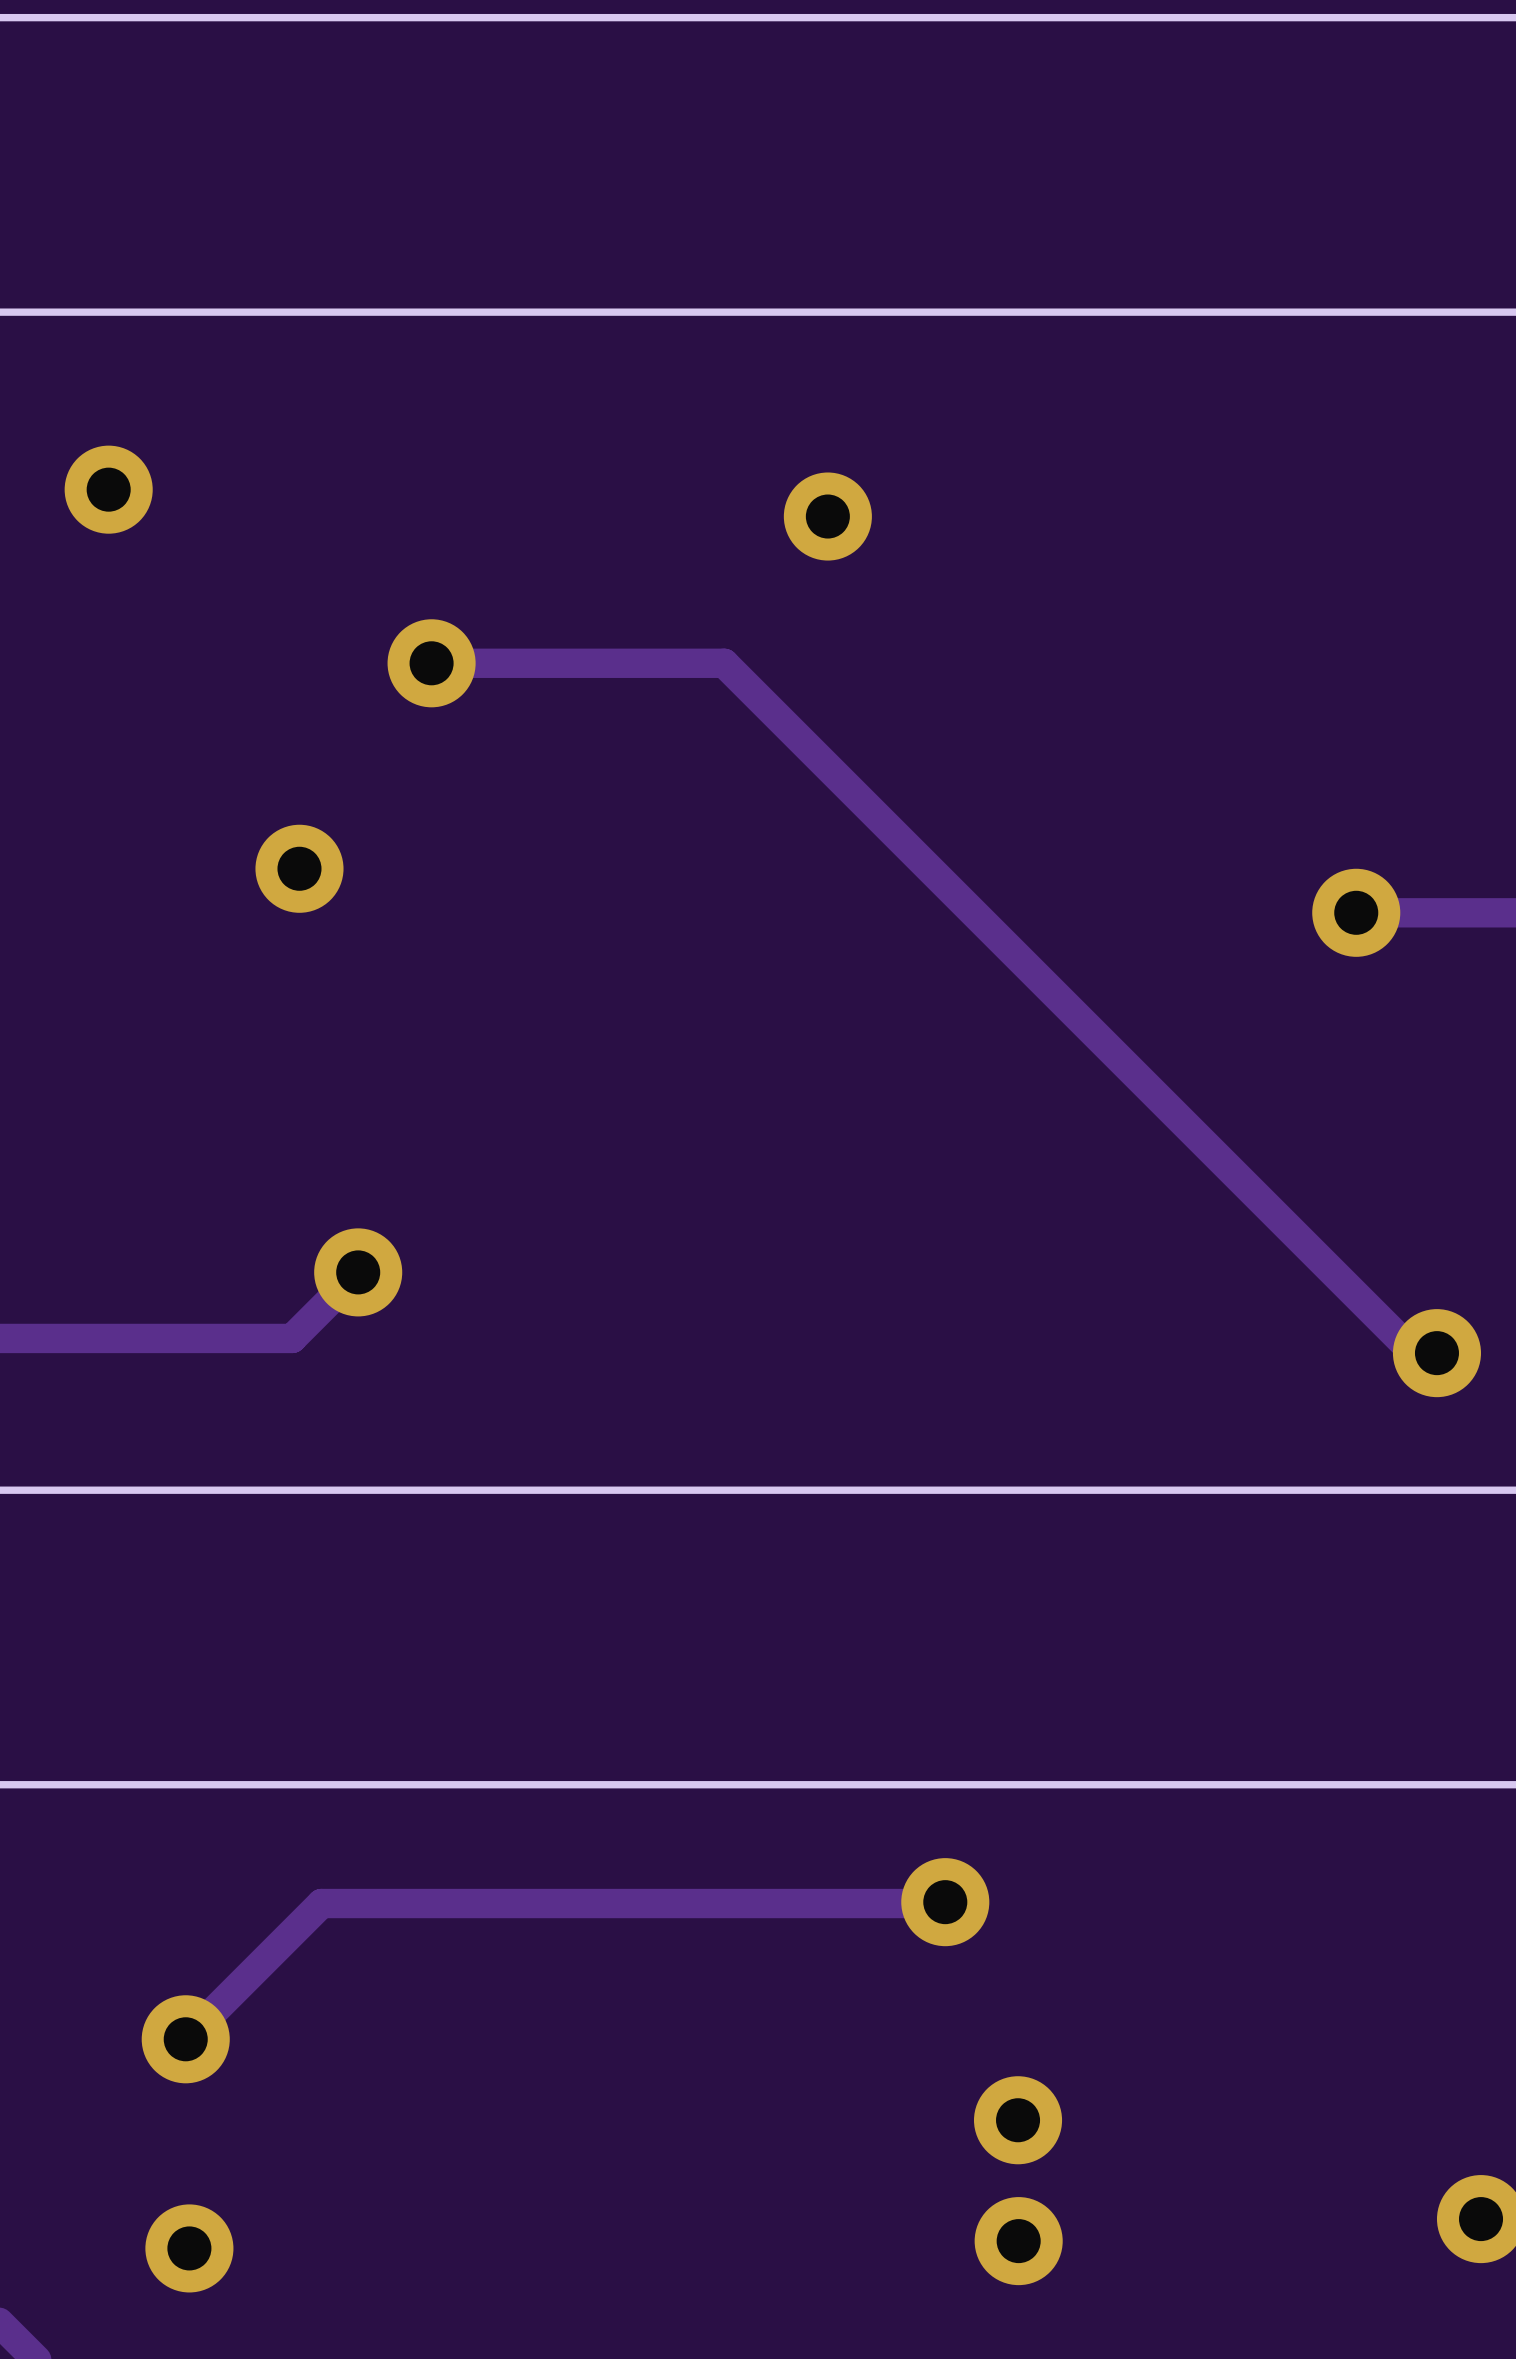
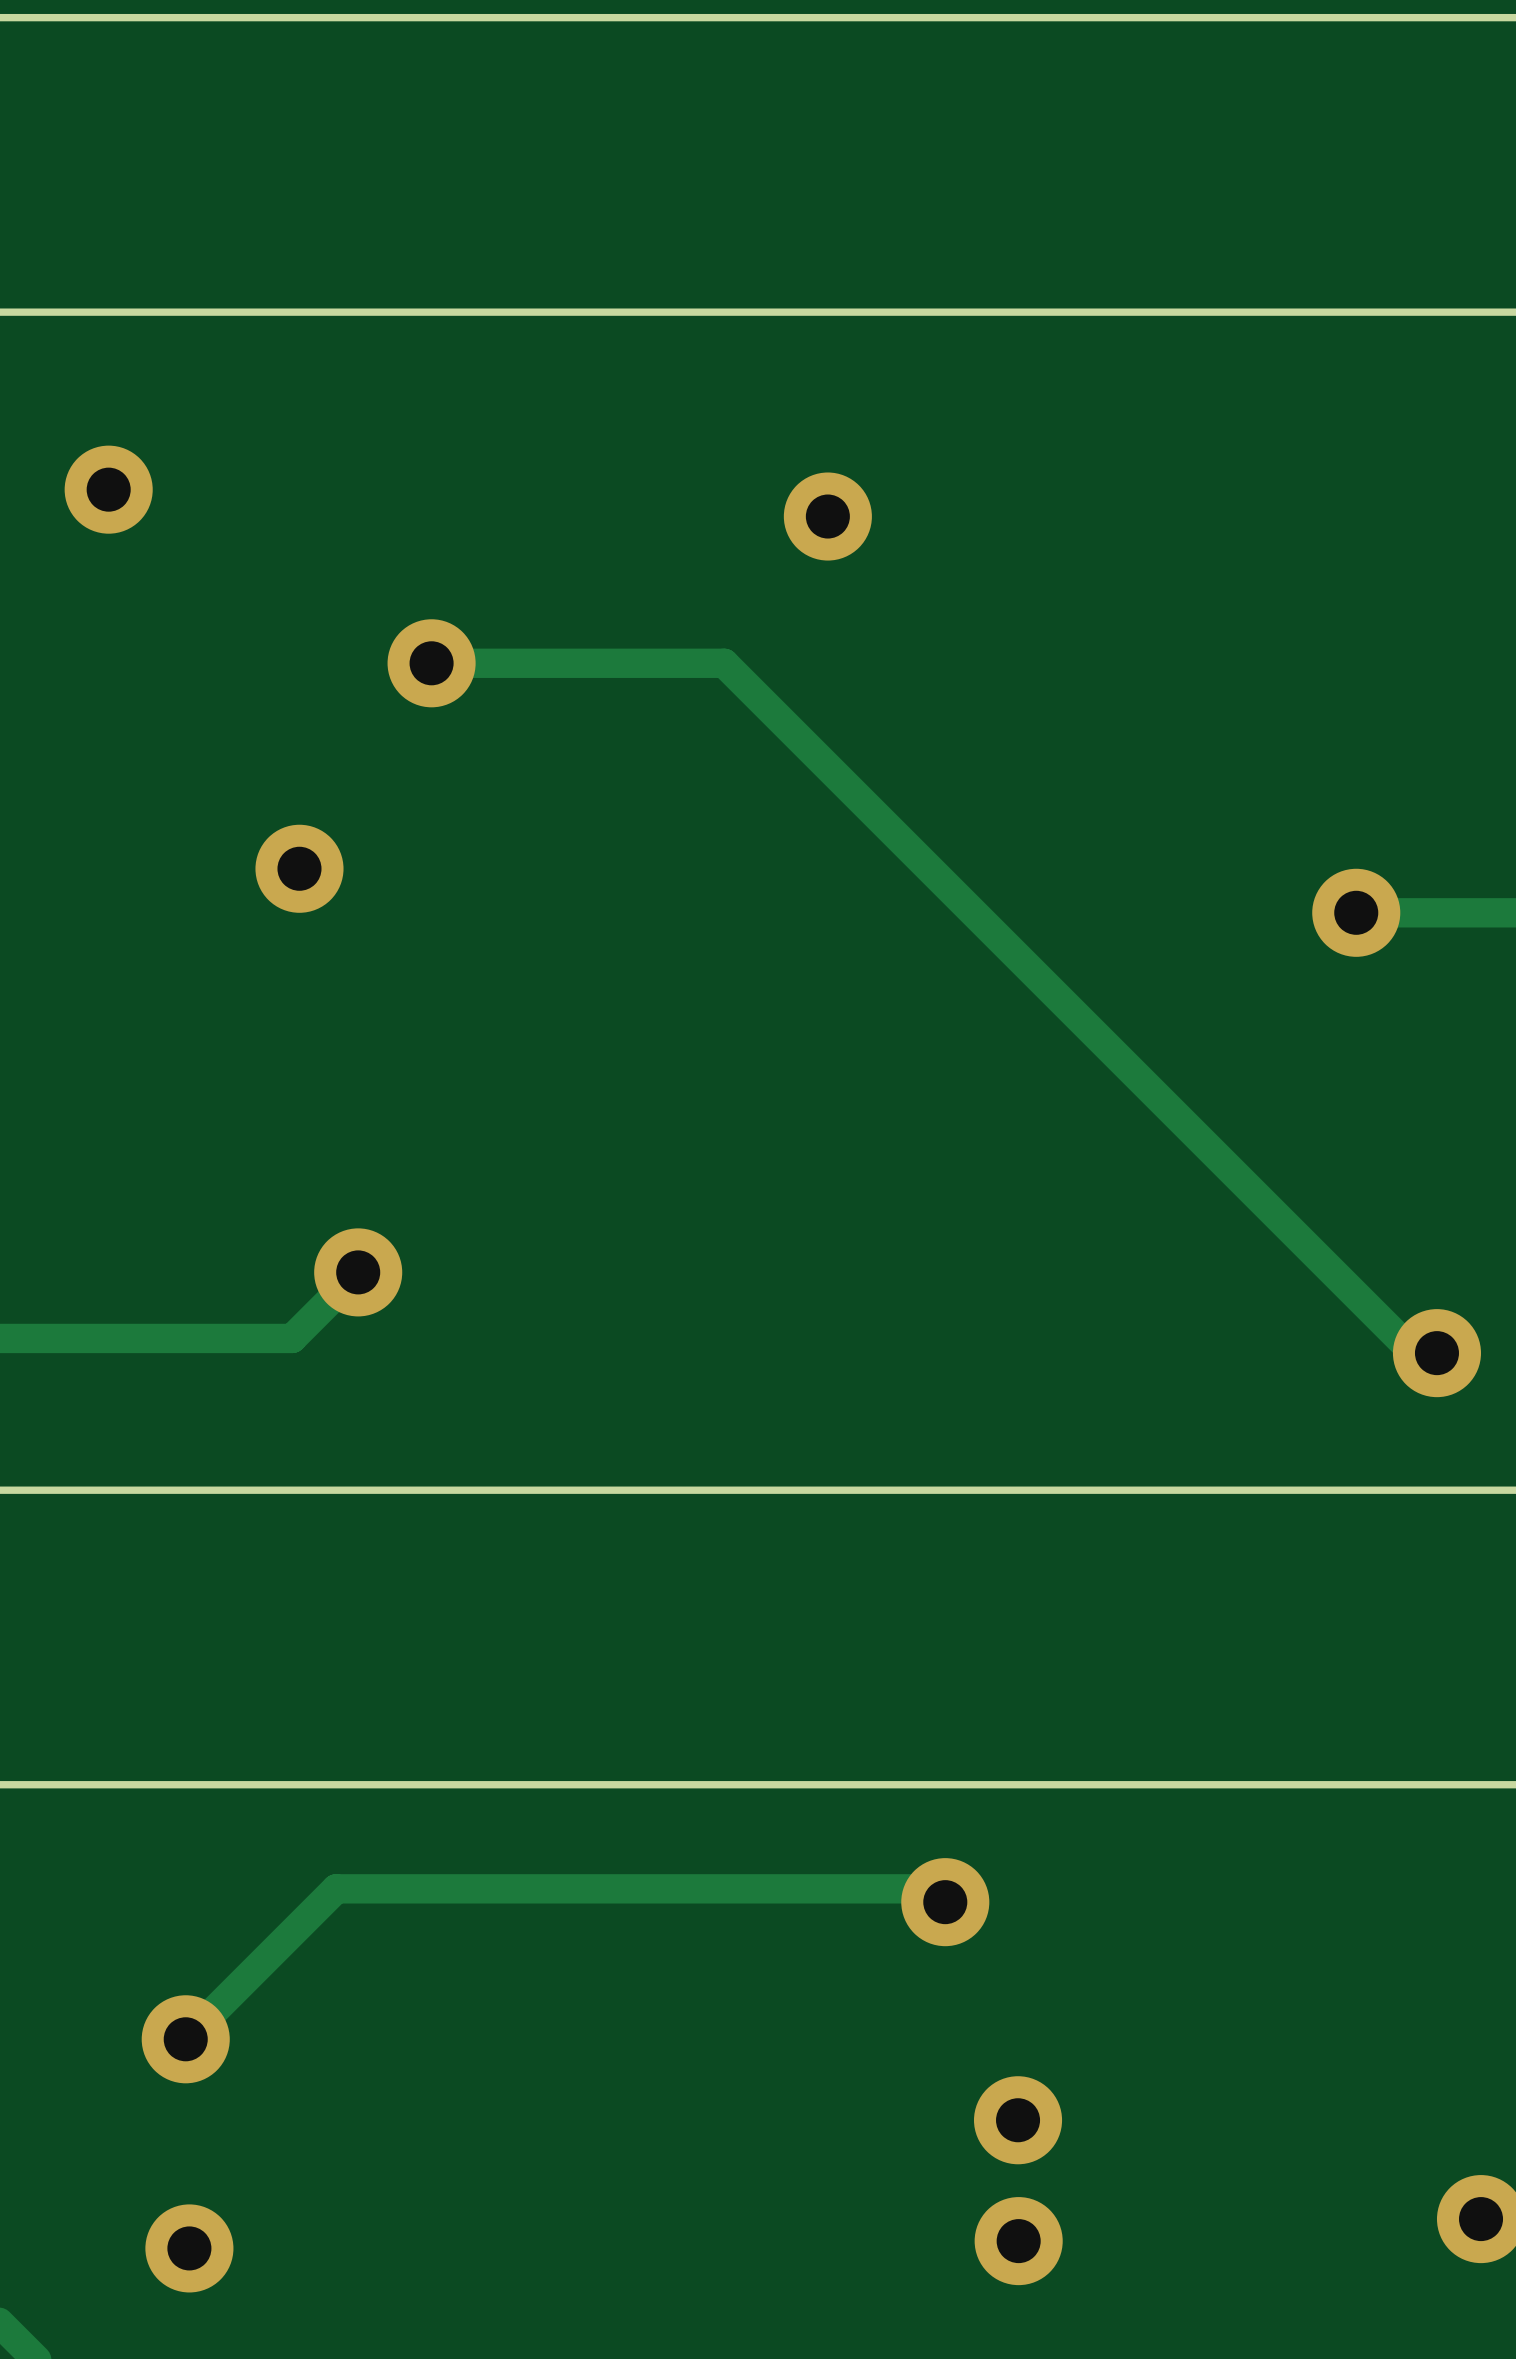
track: (943, 1903) (321, 1903) -> (952, 1902) (939, 1888) (336, 1888) (321, 1903)

